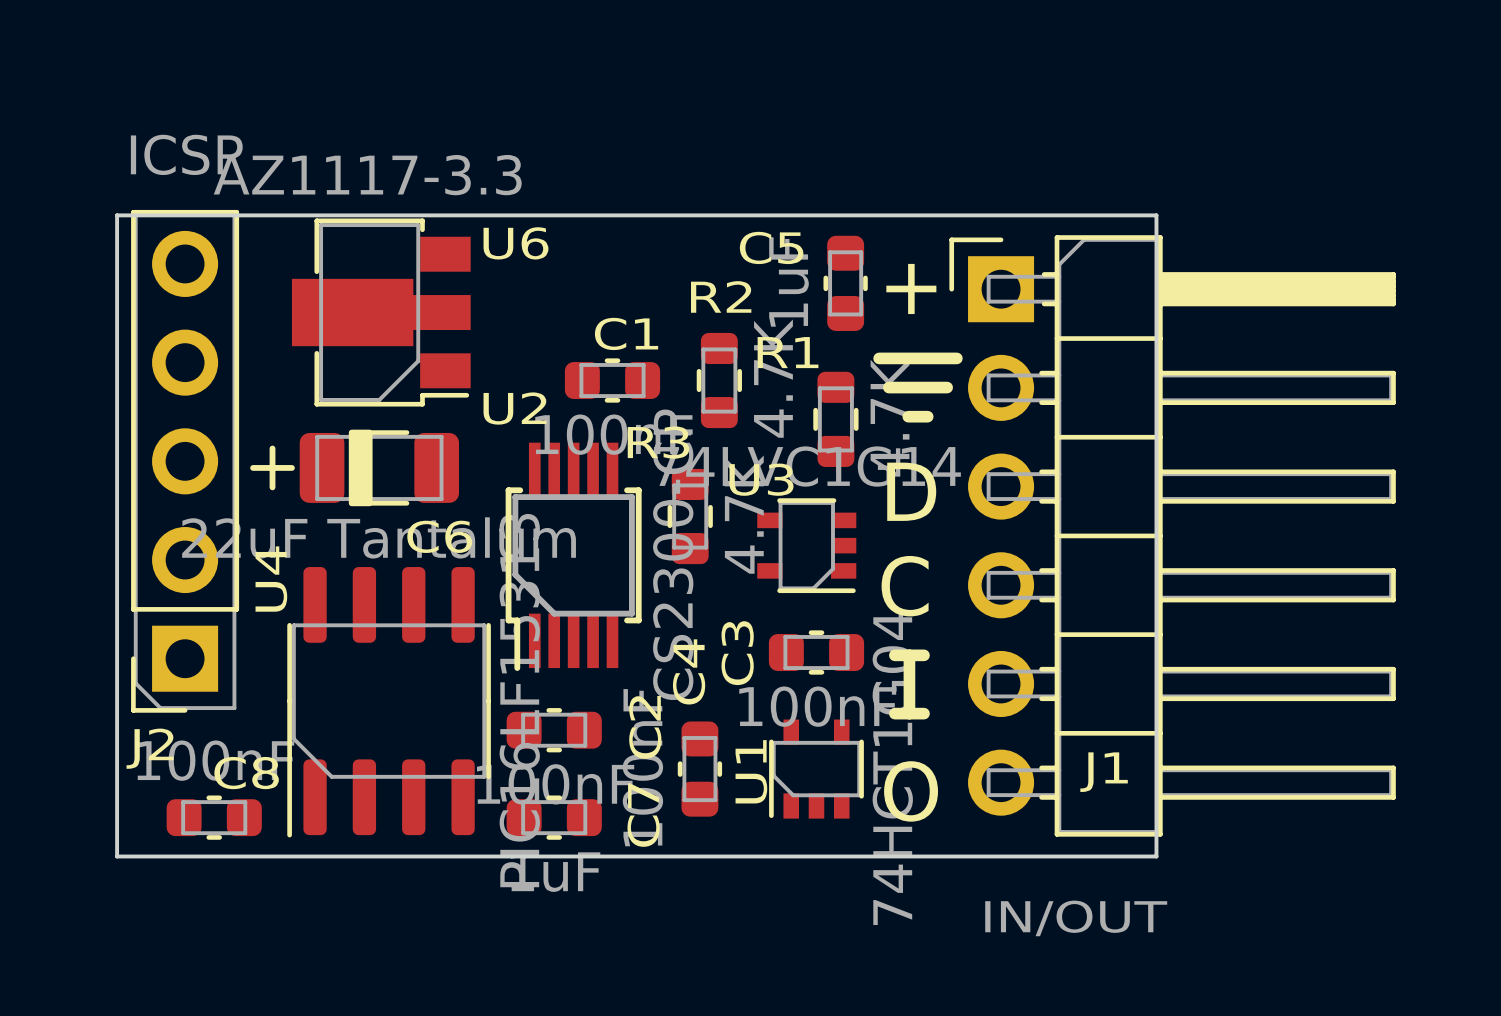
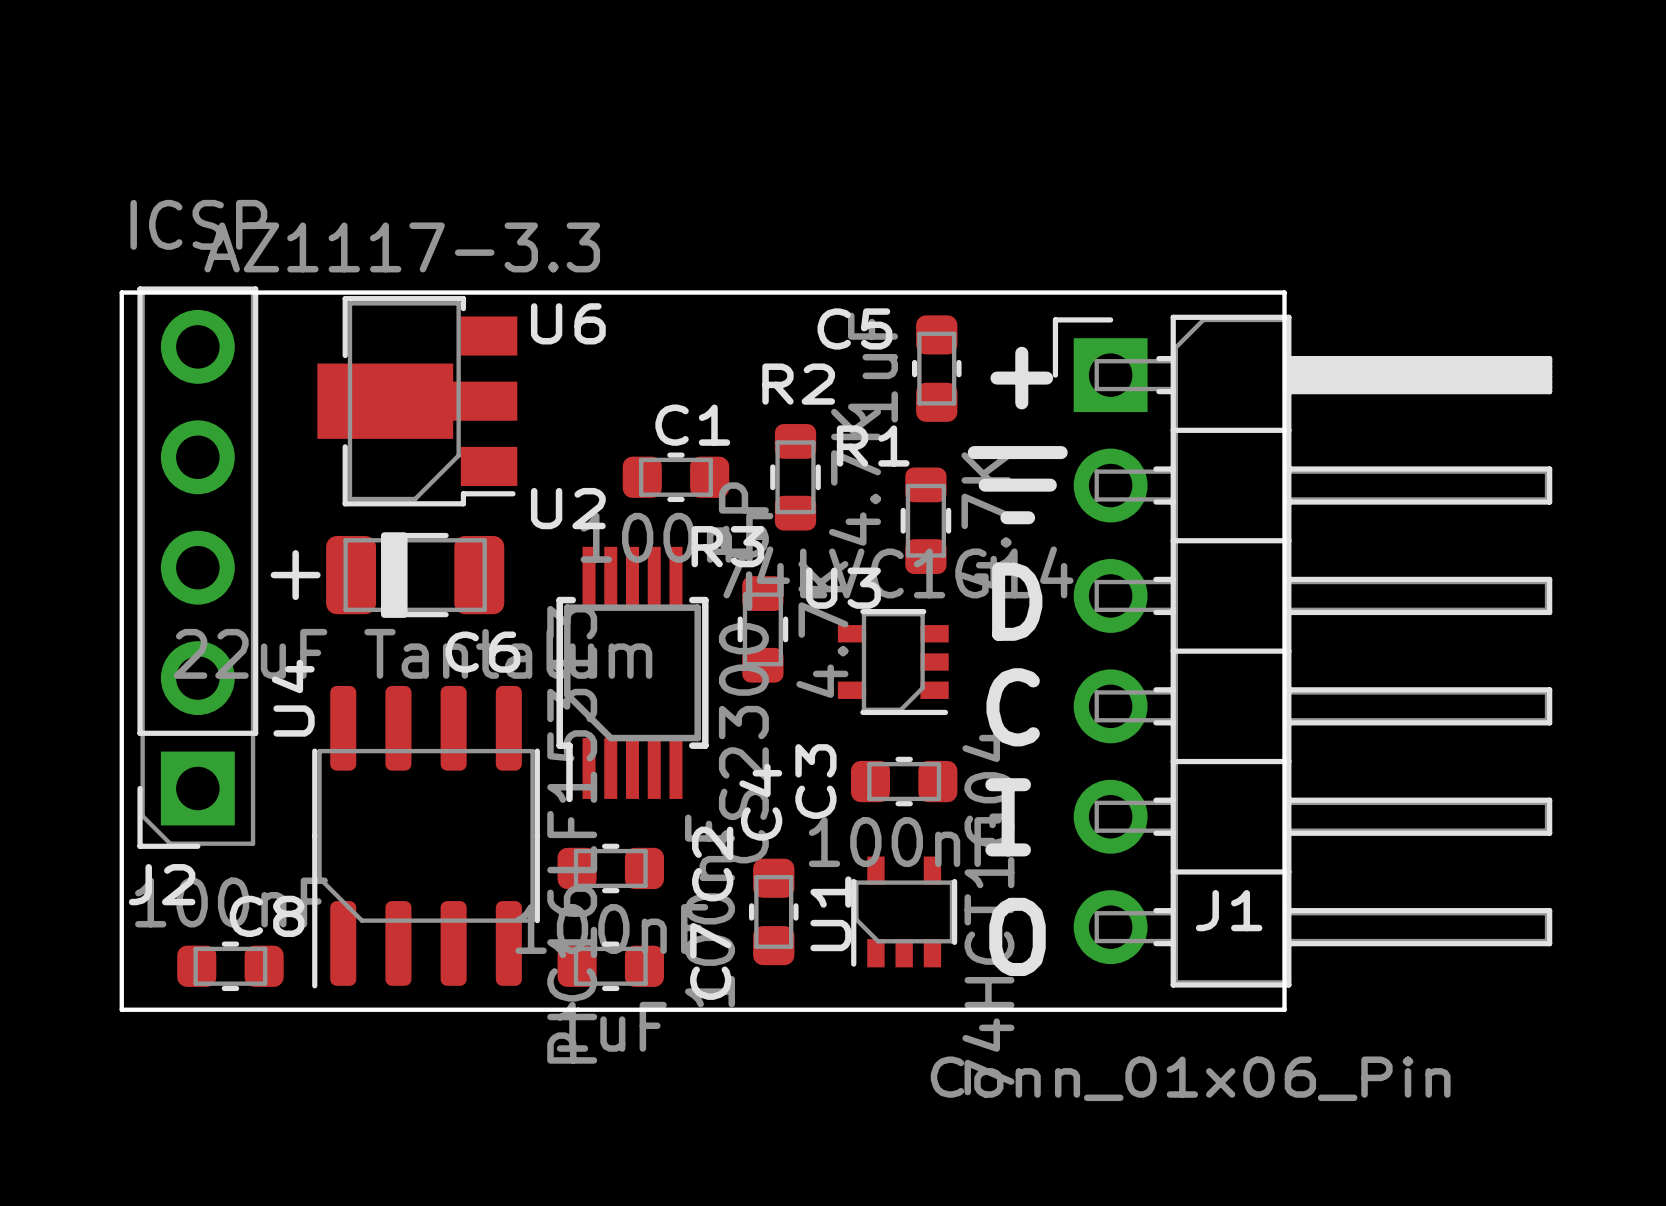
J1 value: IN/OUT (1076, 918) -> Conn_01x06_Pin (1190, 1078)

